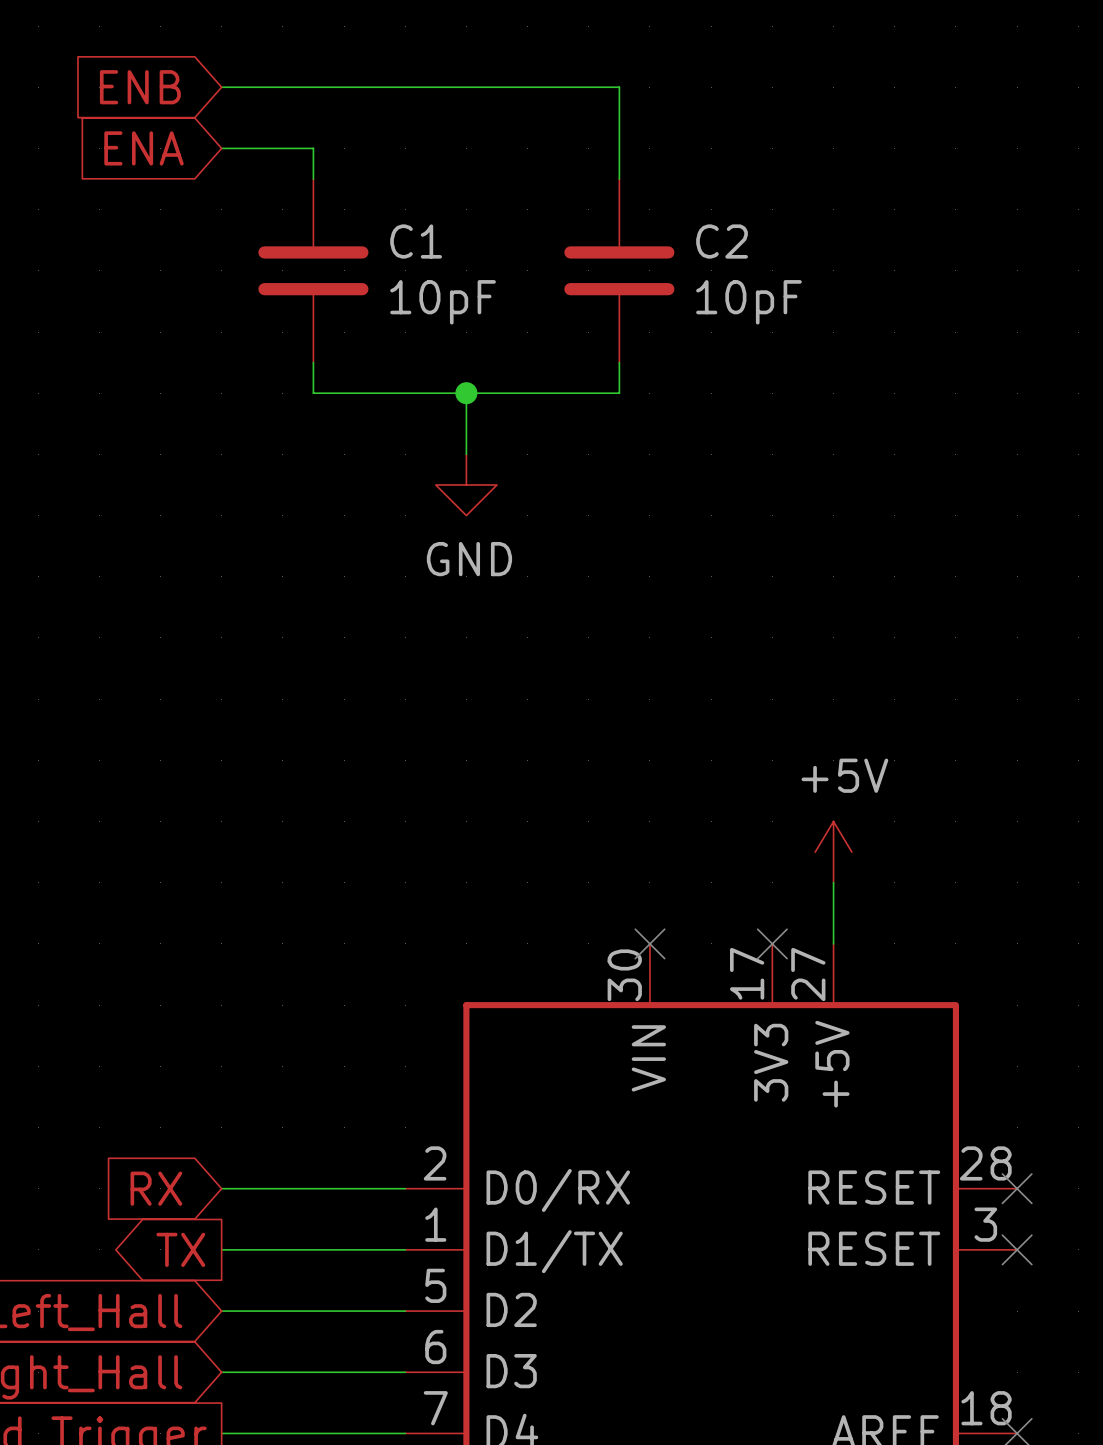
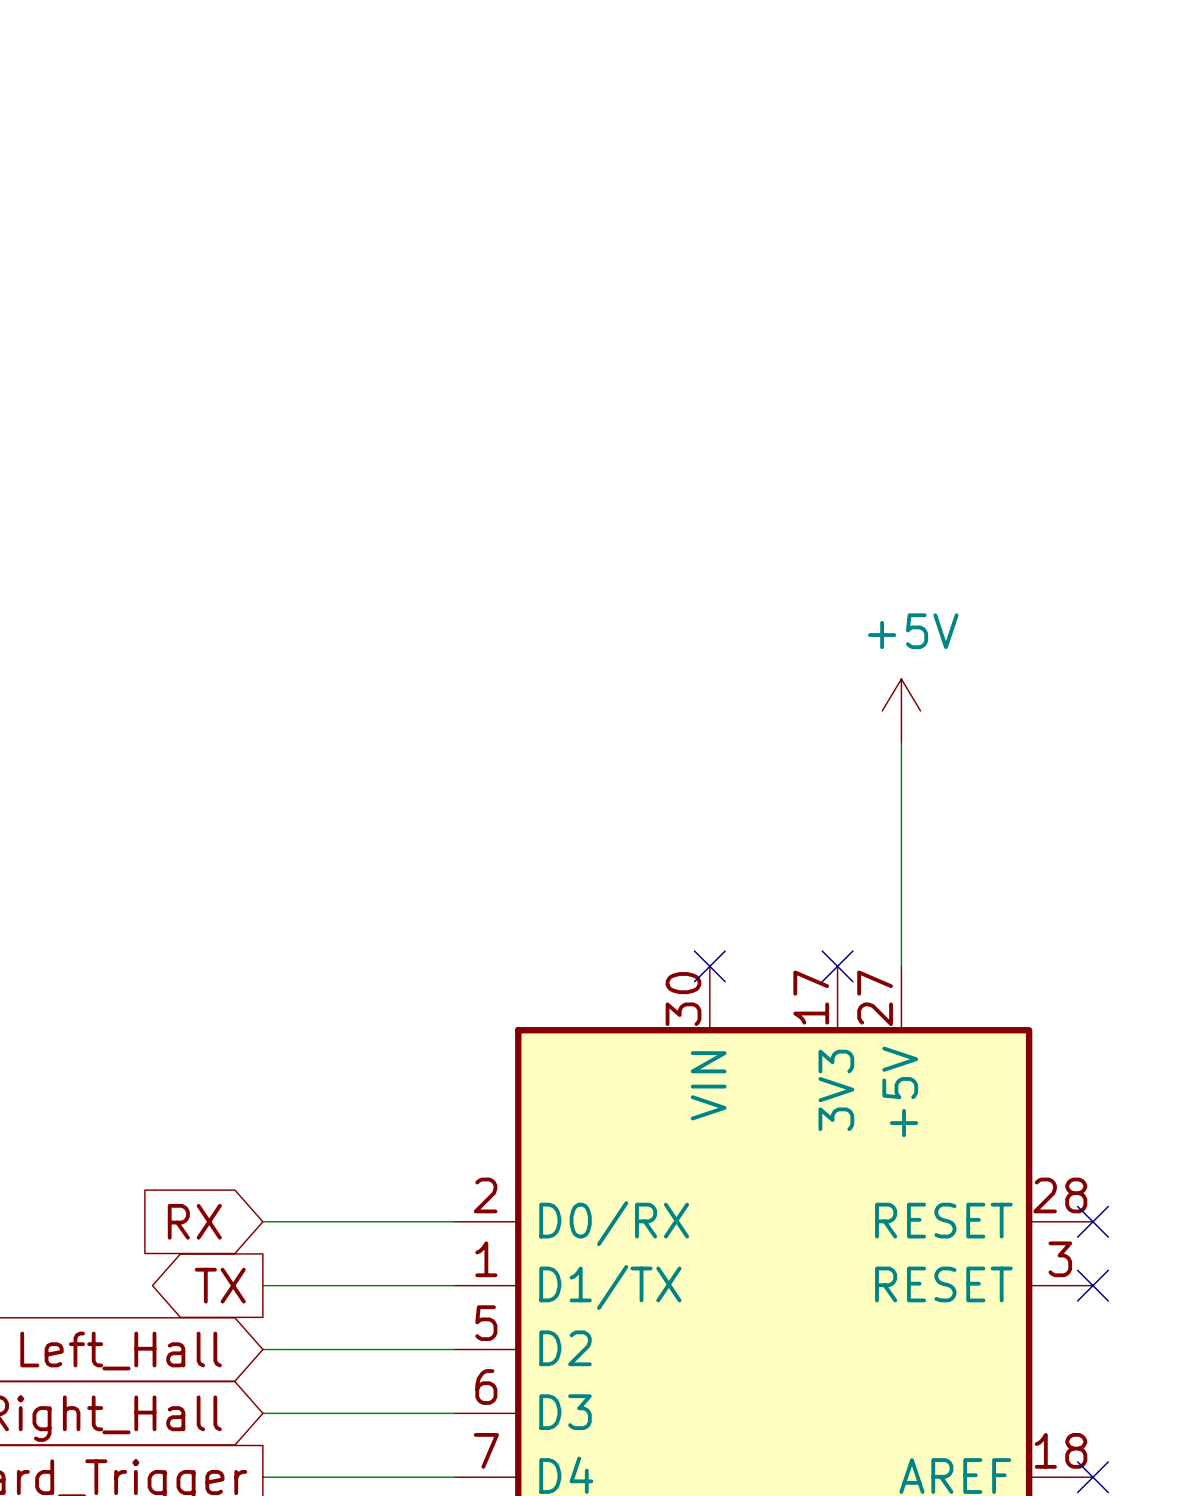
global label: ENB (140, 87) -> none
wire: (221, 87) (619, 87) (619, 179) -> none
global label: ENA (144, 148) -> none
wire: (221, 148) (313, 148) (313, 179) -> none
C1: 10pF (313, 270) -> none
C2: 10pF (619, 270) -> none
wire: (313, 362) (313, 393) (619, 393) (619, 362) -> none
wire: (466, 393) (466, 454) -> none
junction: (466, 393) -> none
power symbol: GND (466, 484) -> none
wire: none -> (901, 742) (901, 902)
power symbol position: +5V (833, 852) -> +5V (901, 710)

